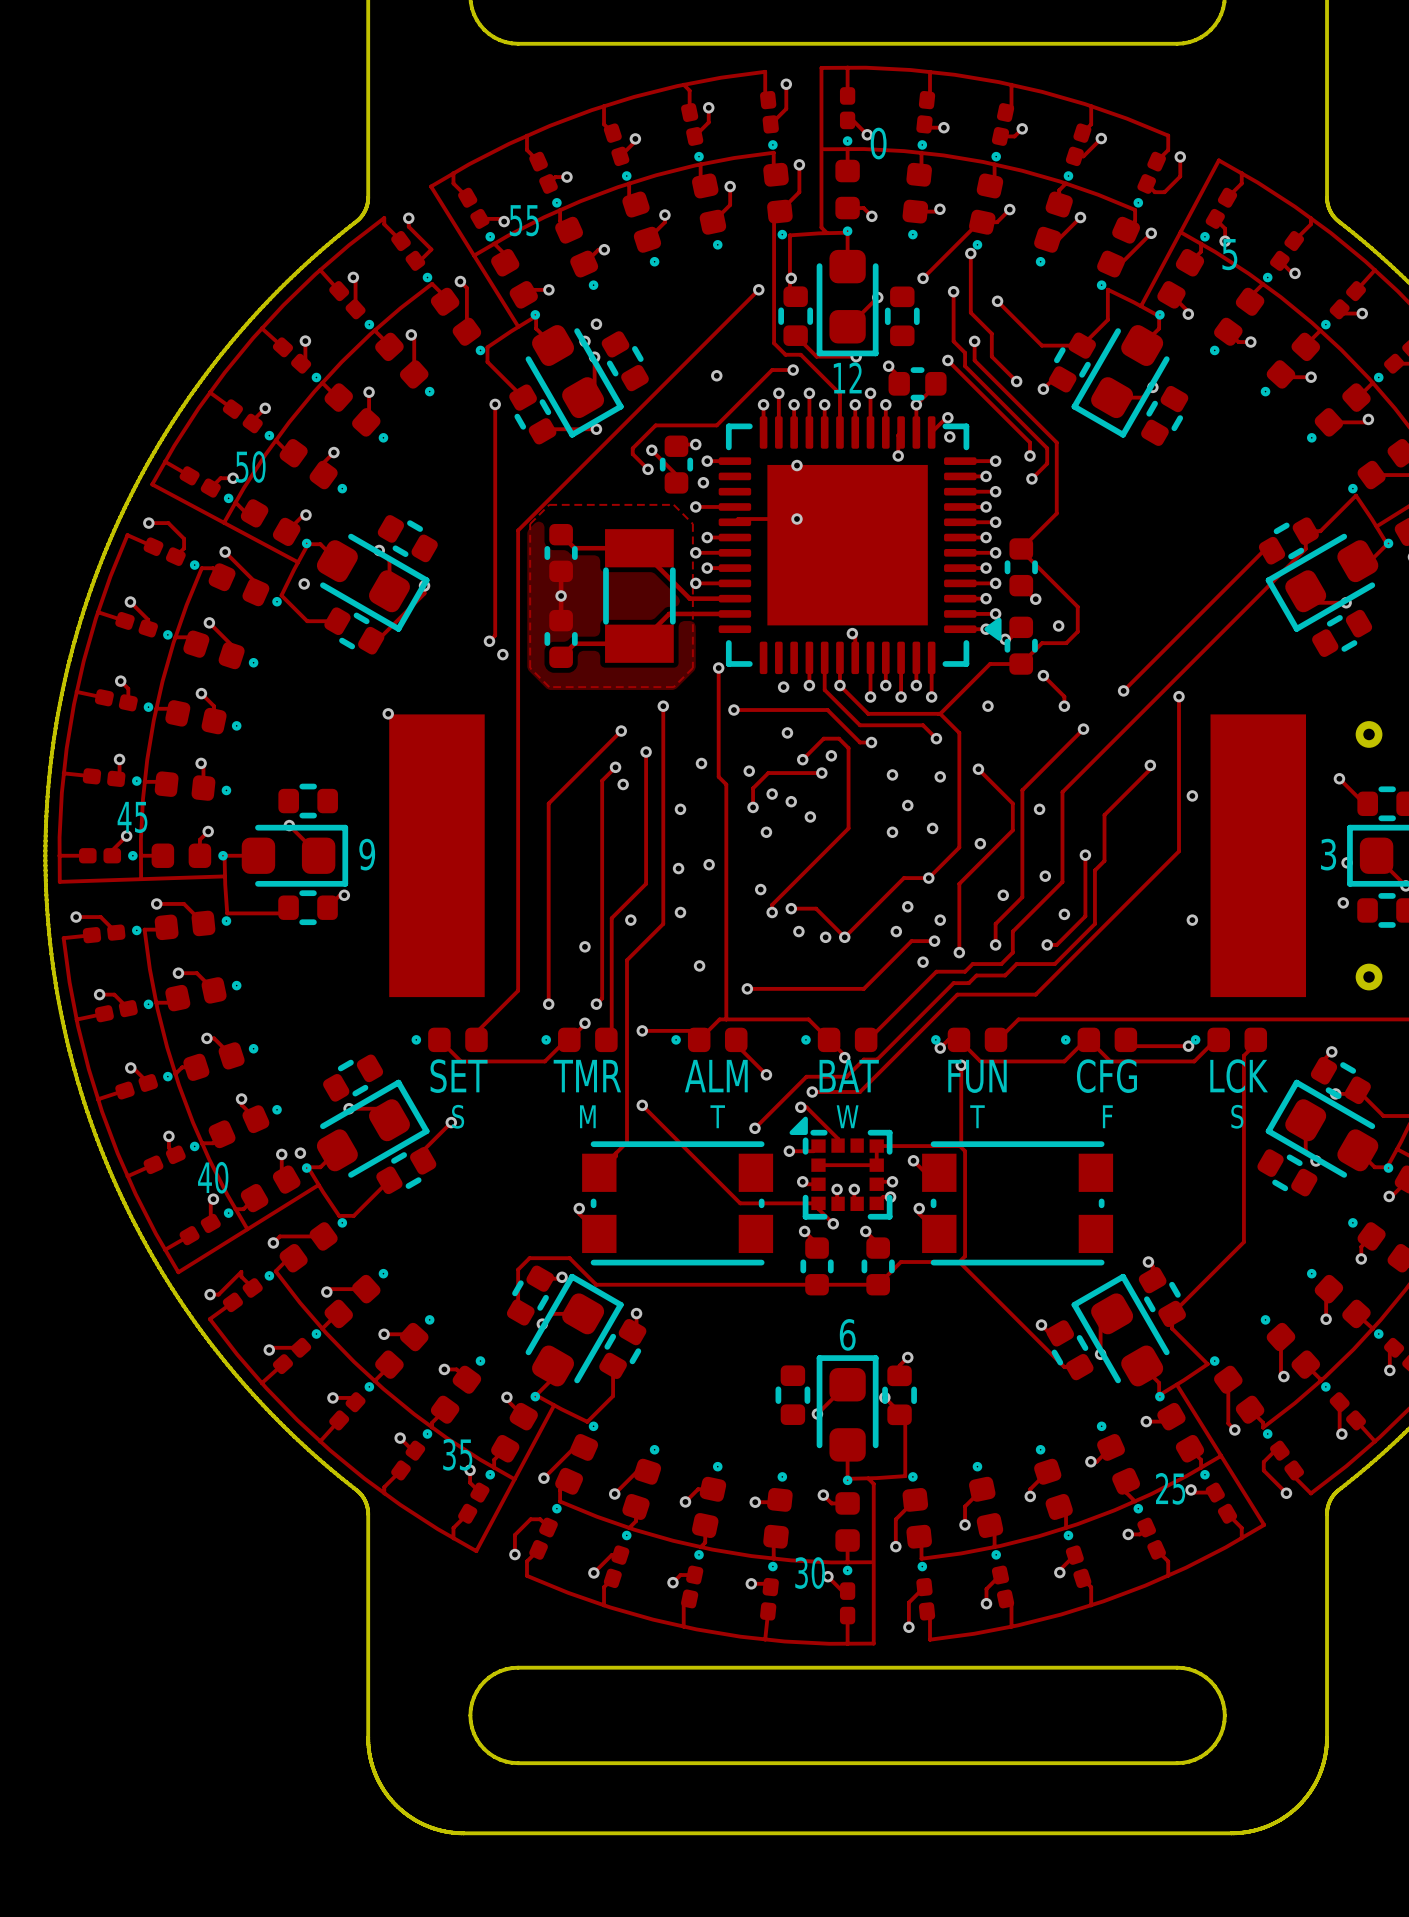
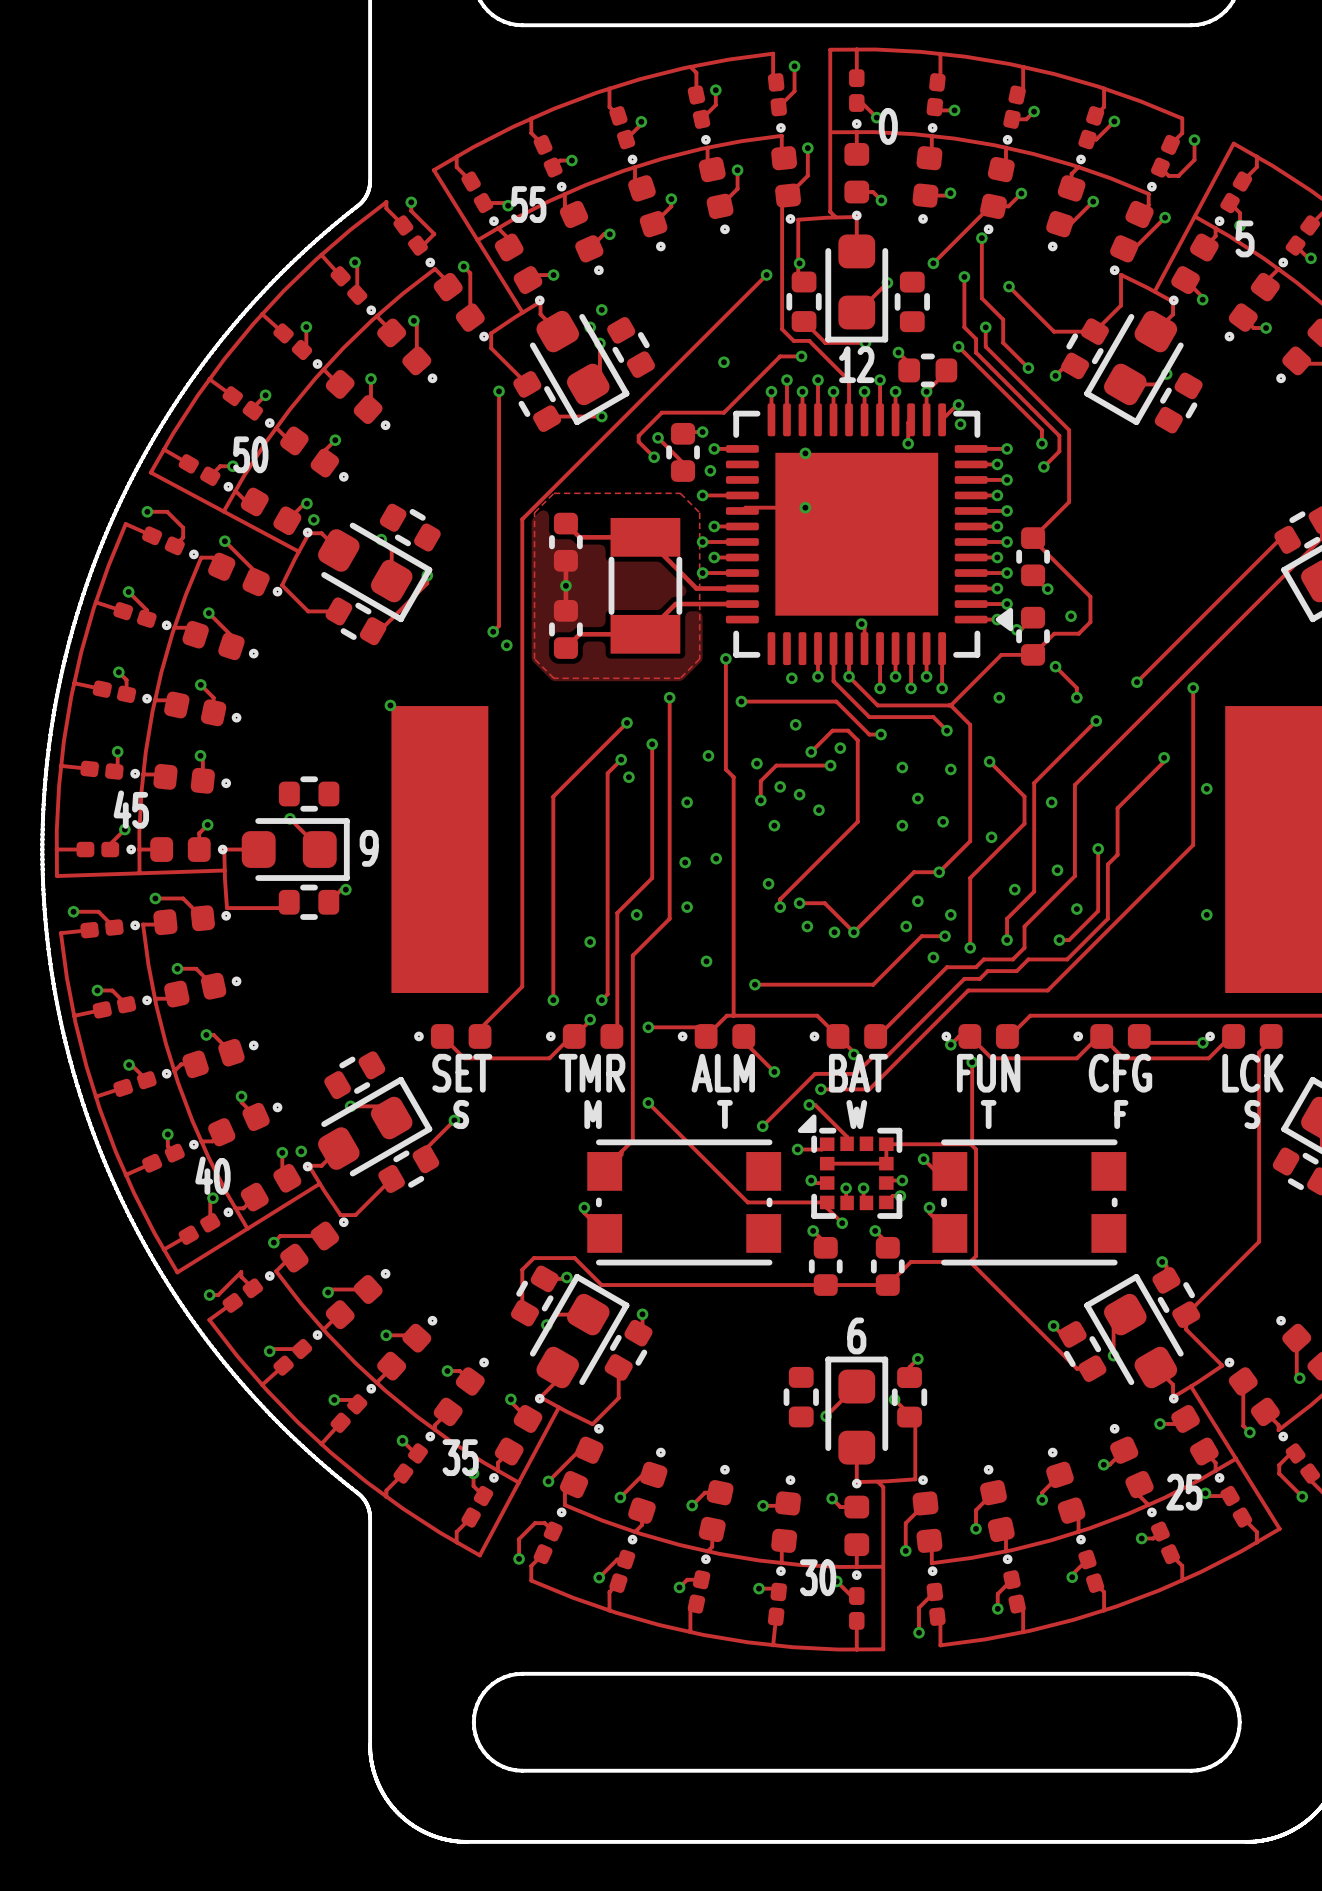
via position: (304, 583) -> (313, 519)

